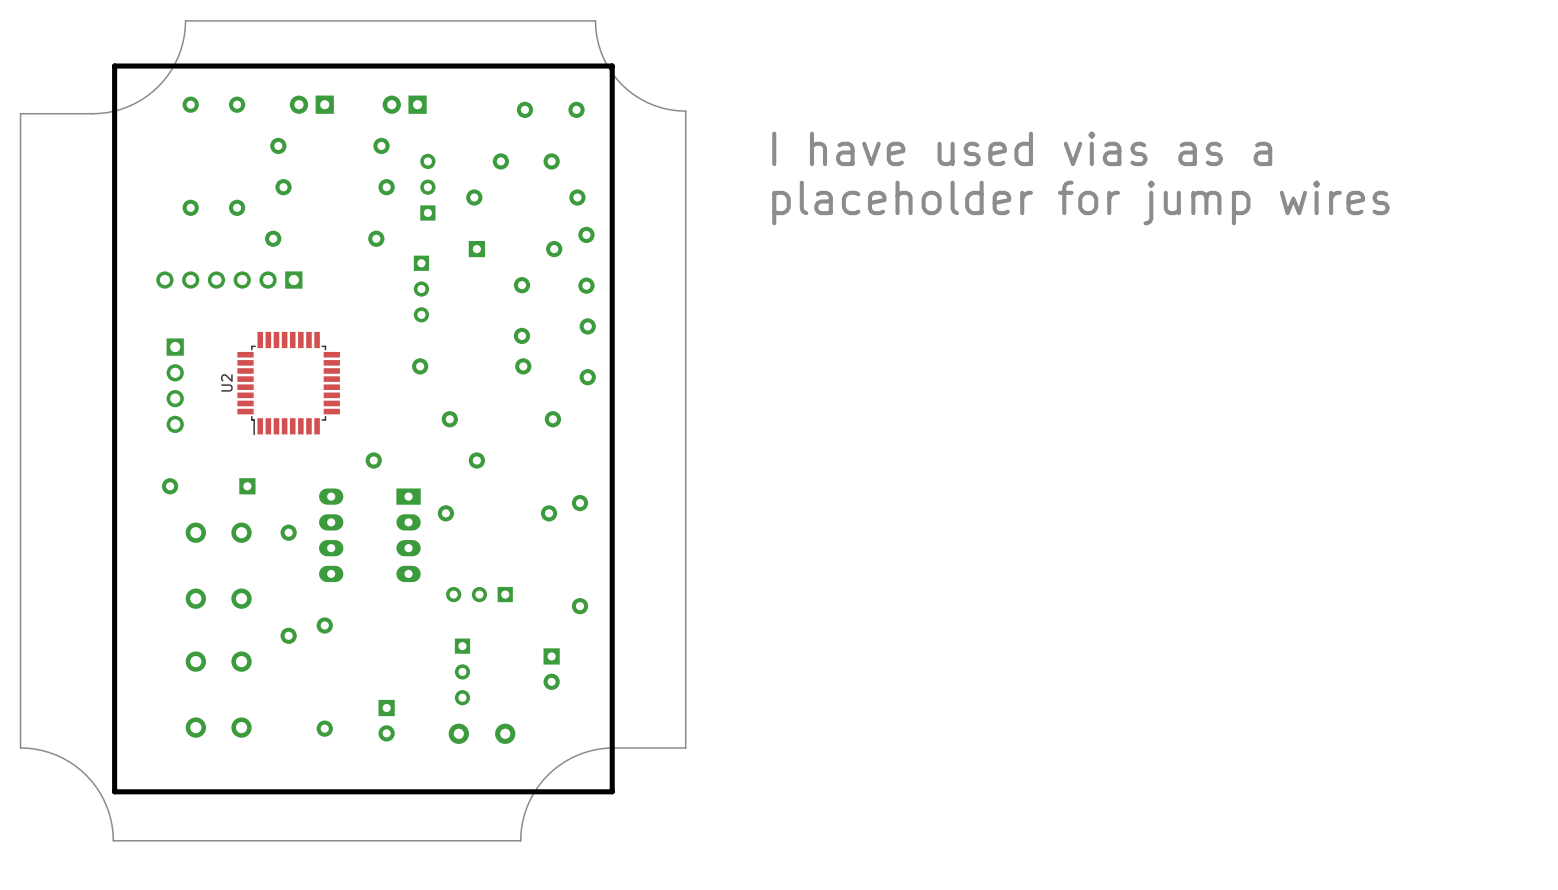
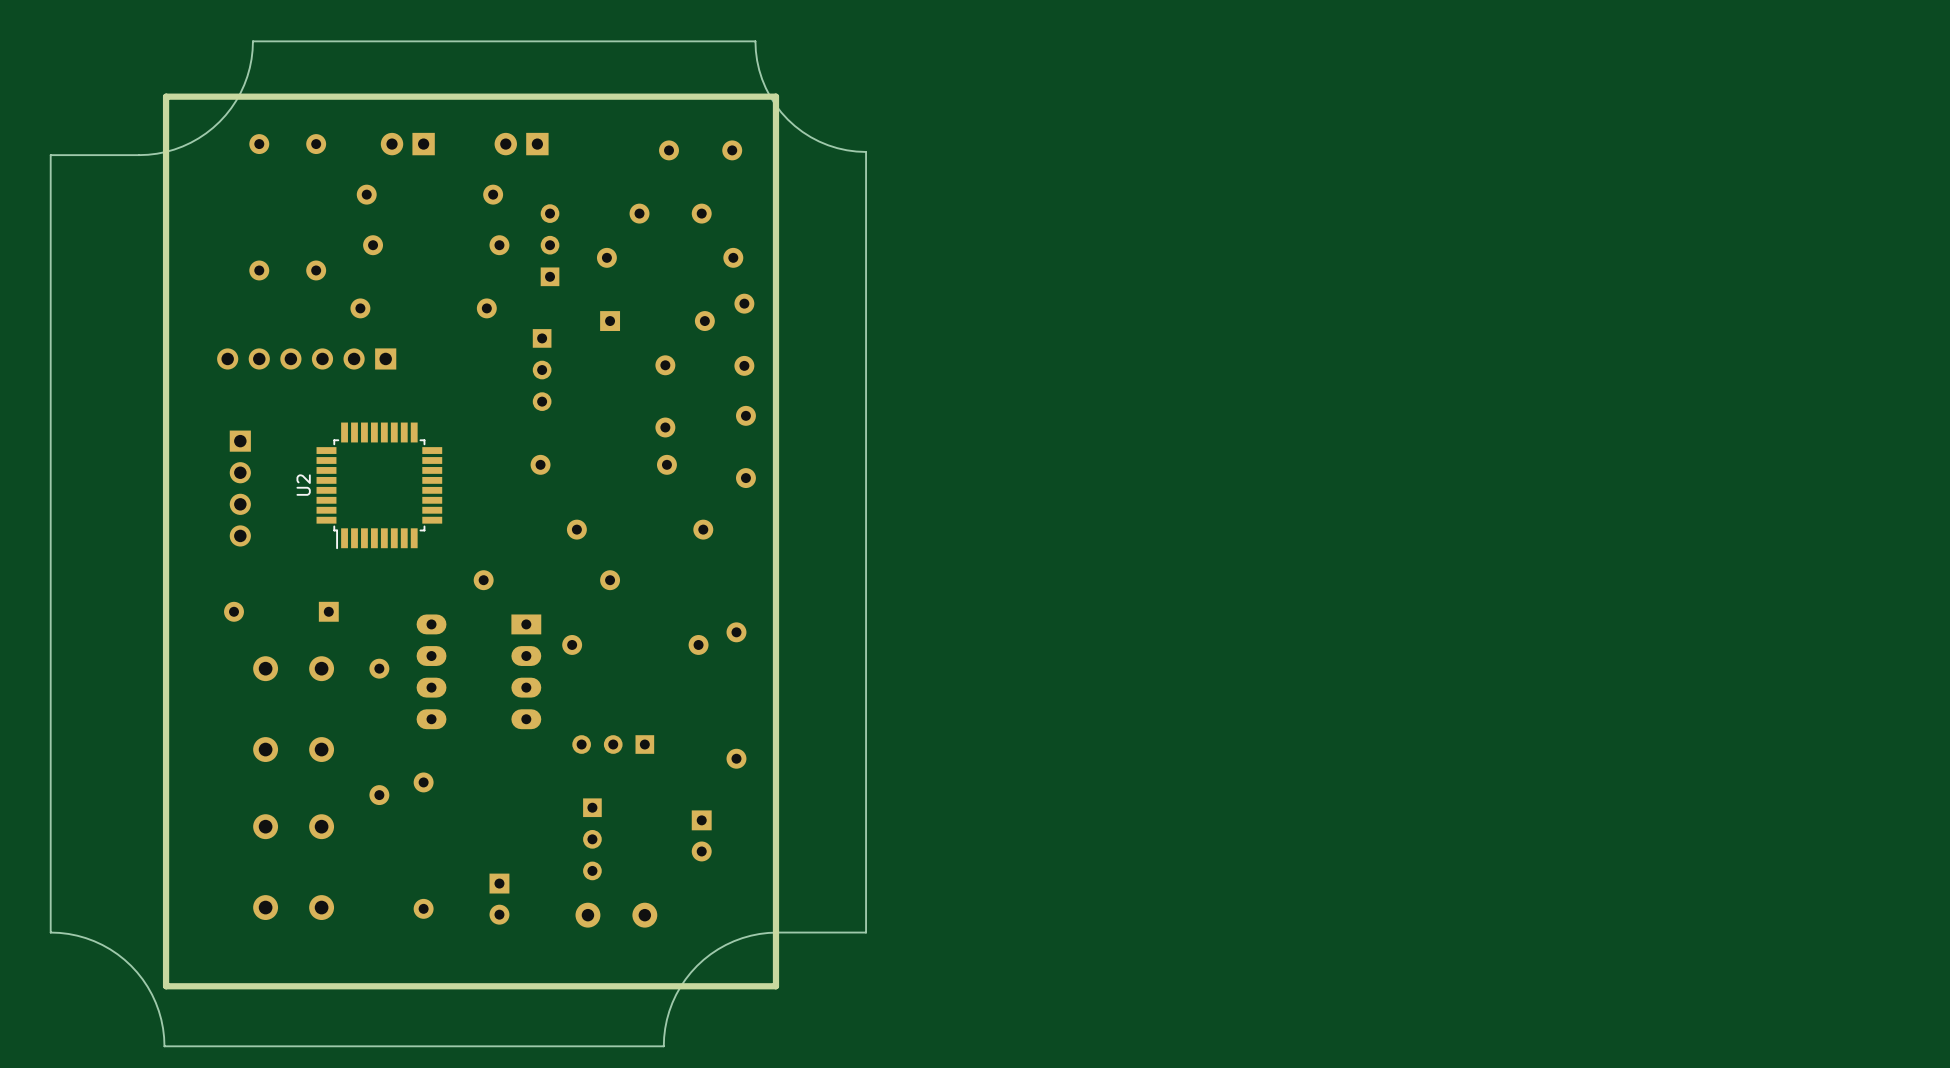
text: I have used vias as a (1022, 148) -> none
text: placeholder for jump wires (1080, 202) -> none

